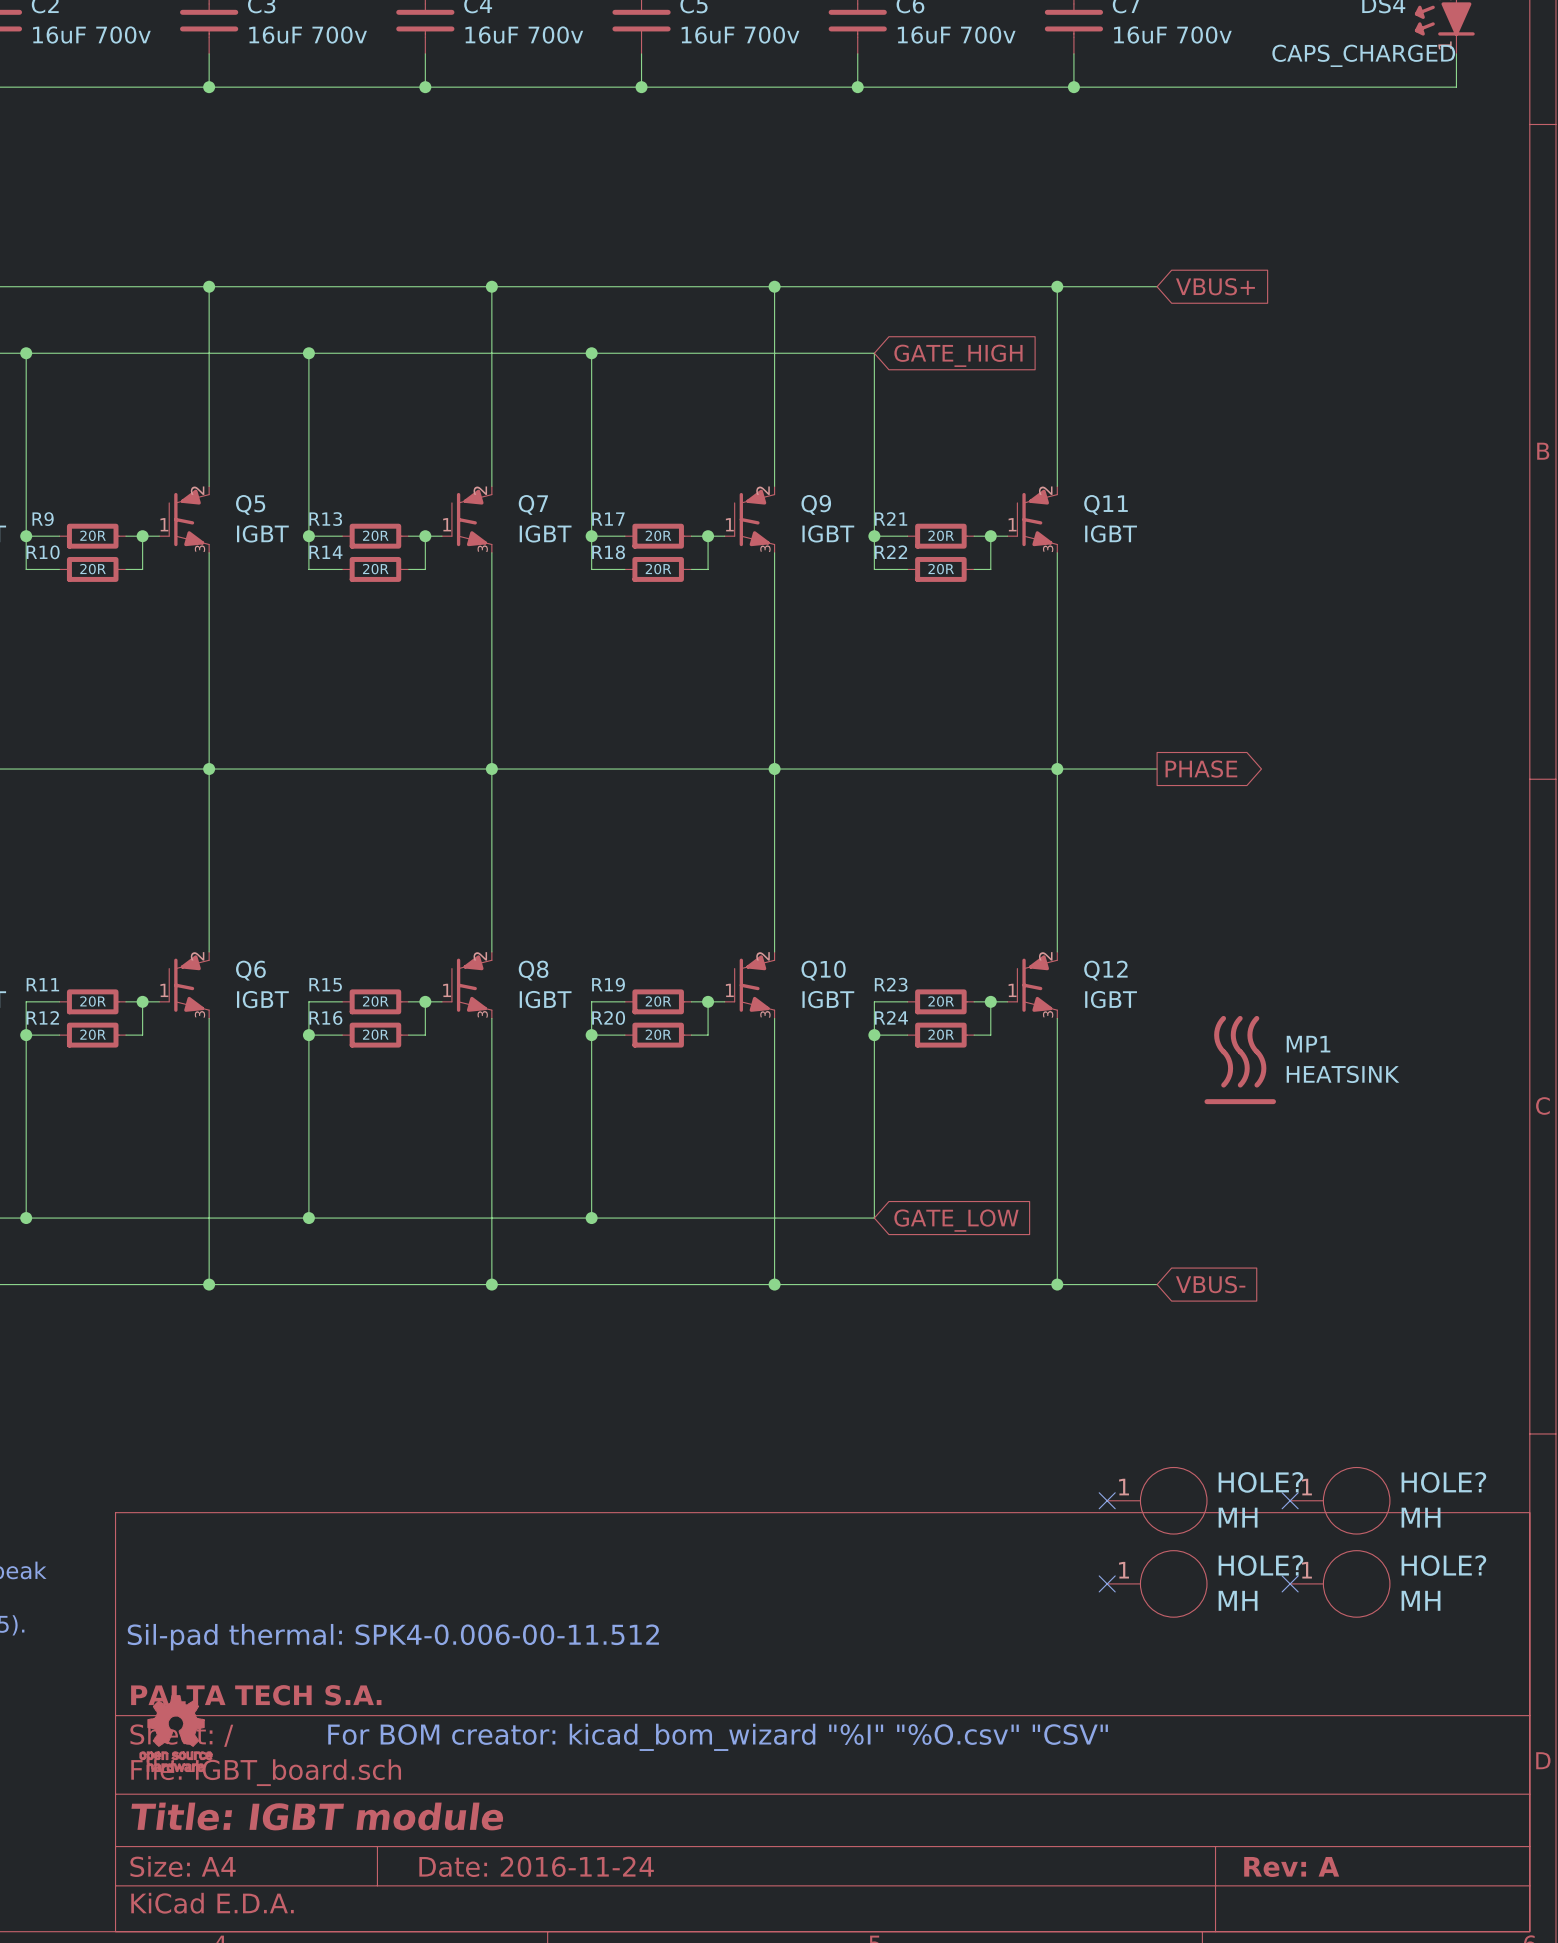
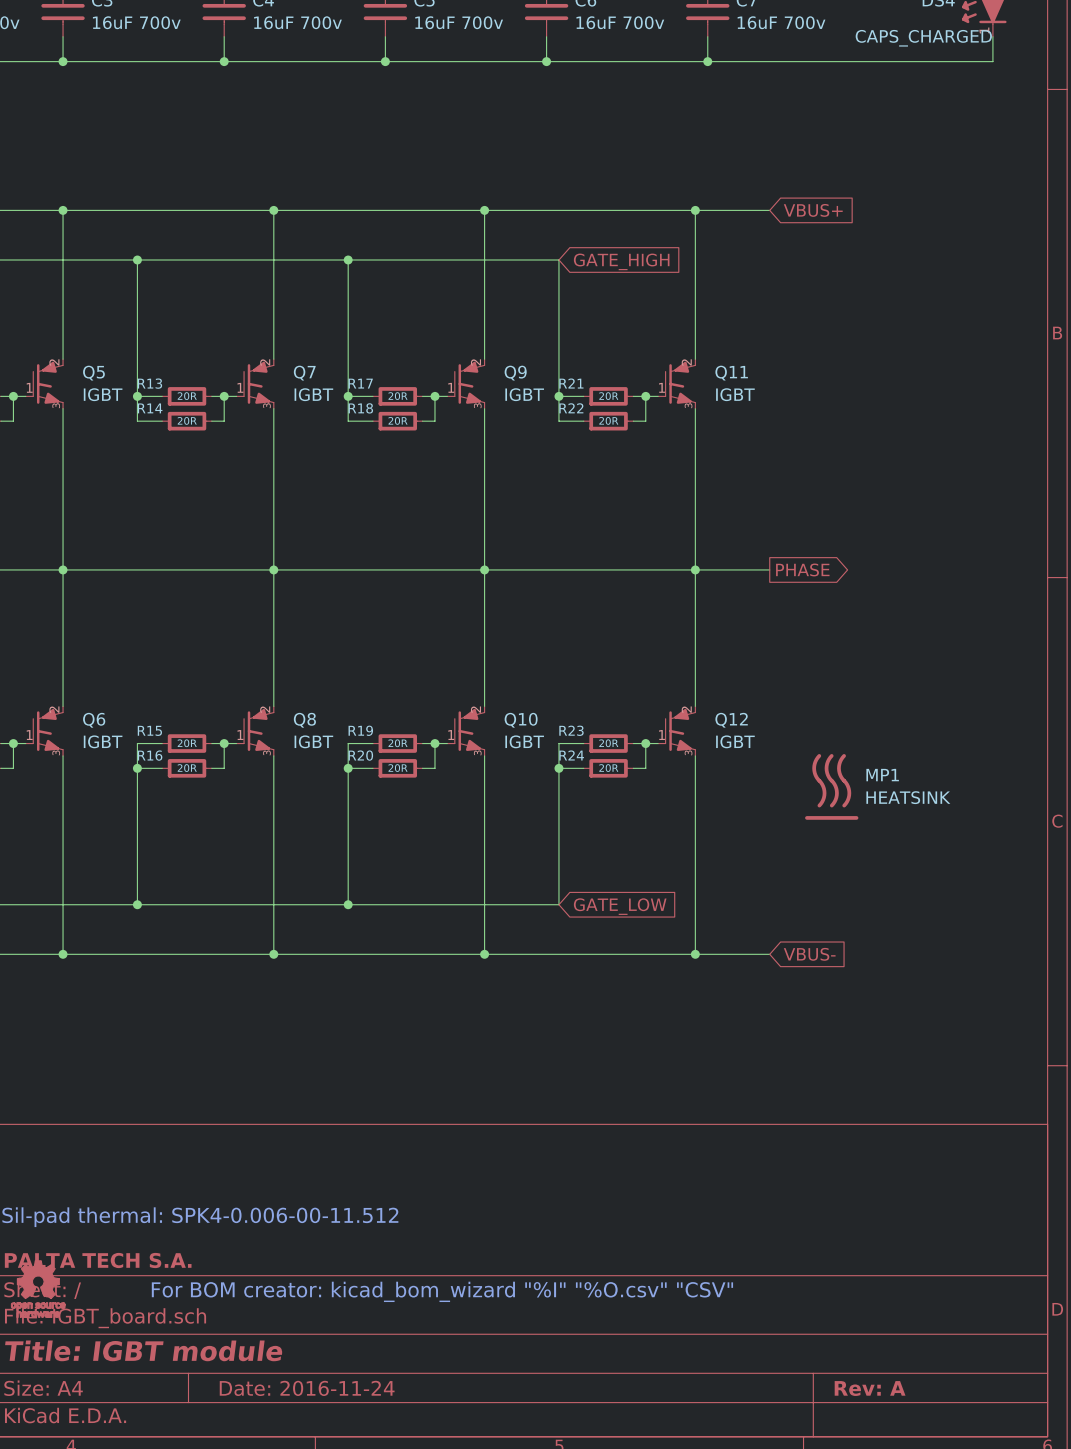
no-connect mark: (1107, 1500) -> none
HOLE?: MH (1157, 1500) -> none
no-connect mark: (1290, 1500) -> none
HOLE?: MH (1340, 1500) -> none
no-connect mark: (1107, 1583) -> none
HOLE?: MH (1157, 1583) -> none
no-connect mark: (1290, 1583) -> none
HOLE?: MH (1340, 1583) -> none

